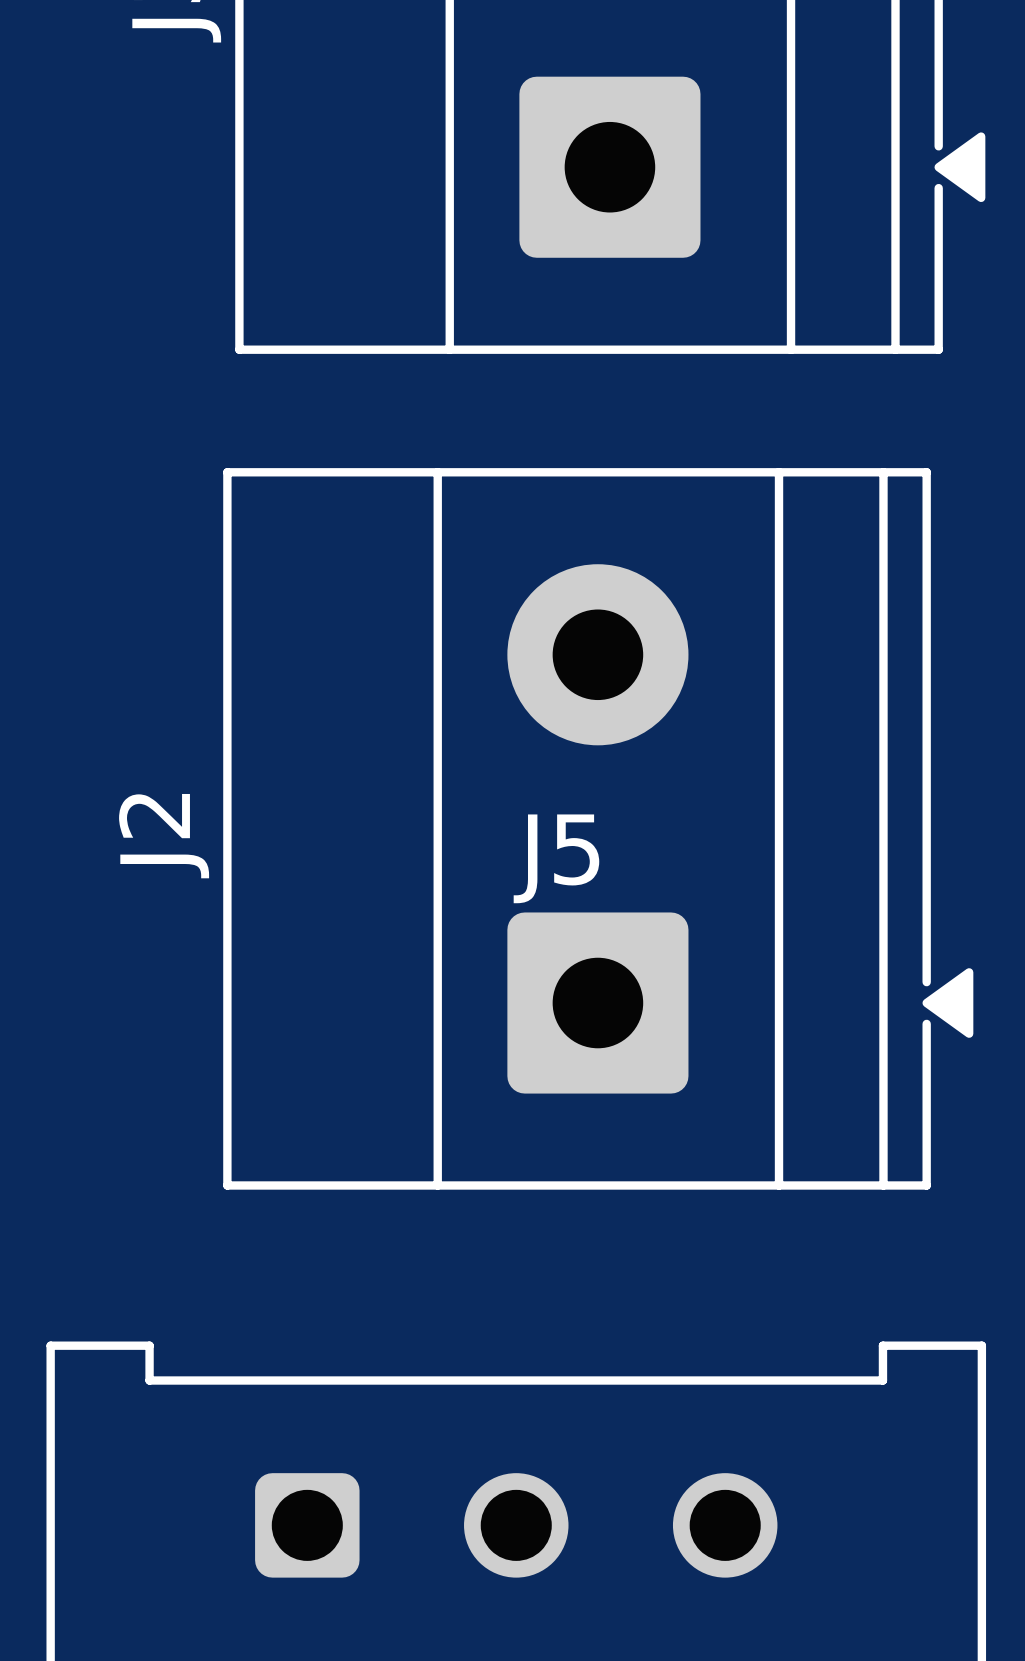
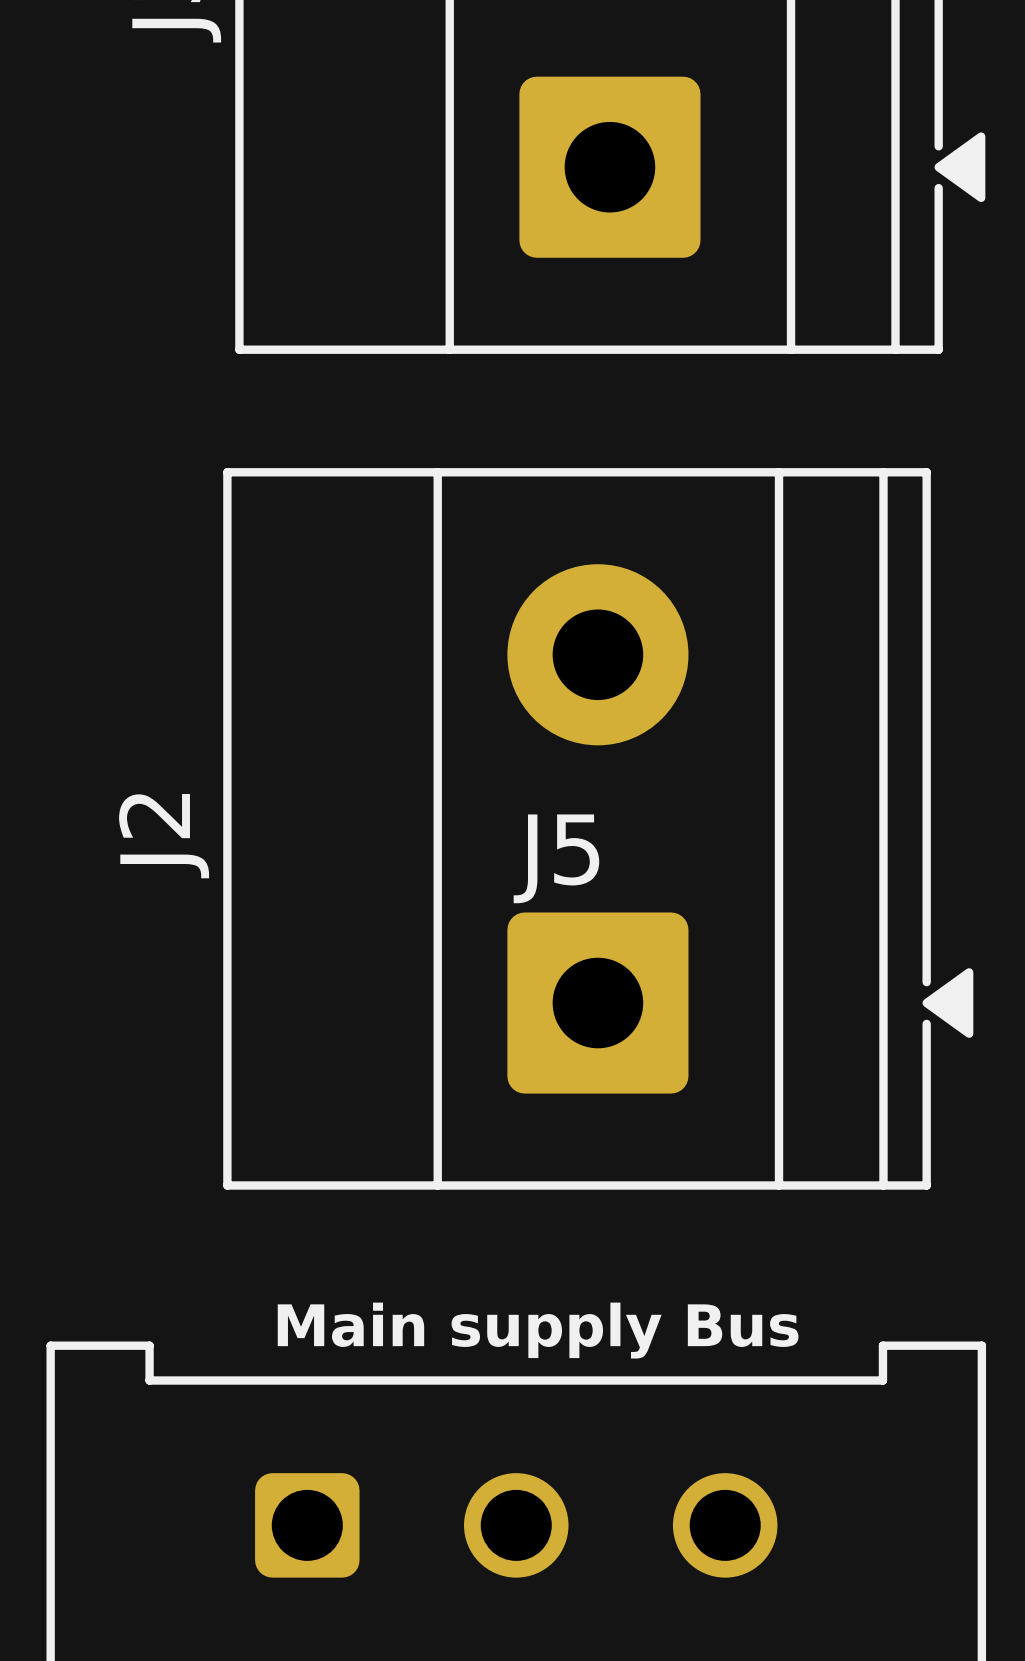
text: none -> Main supply Bus (538, 1330)

